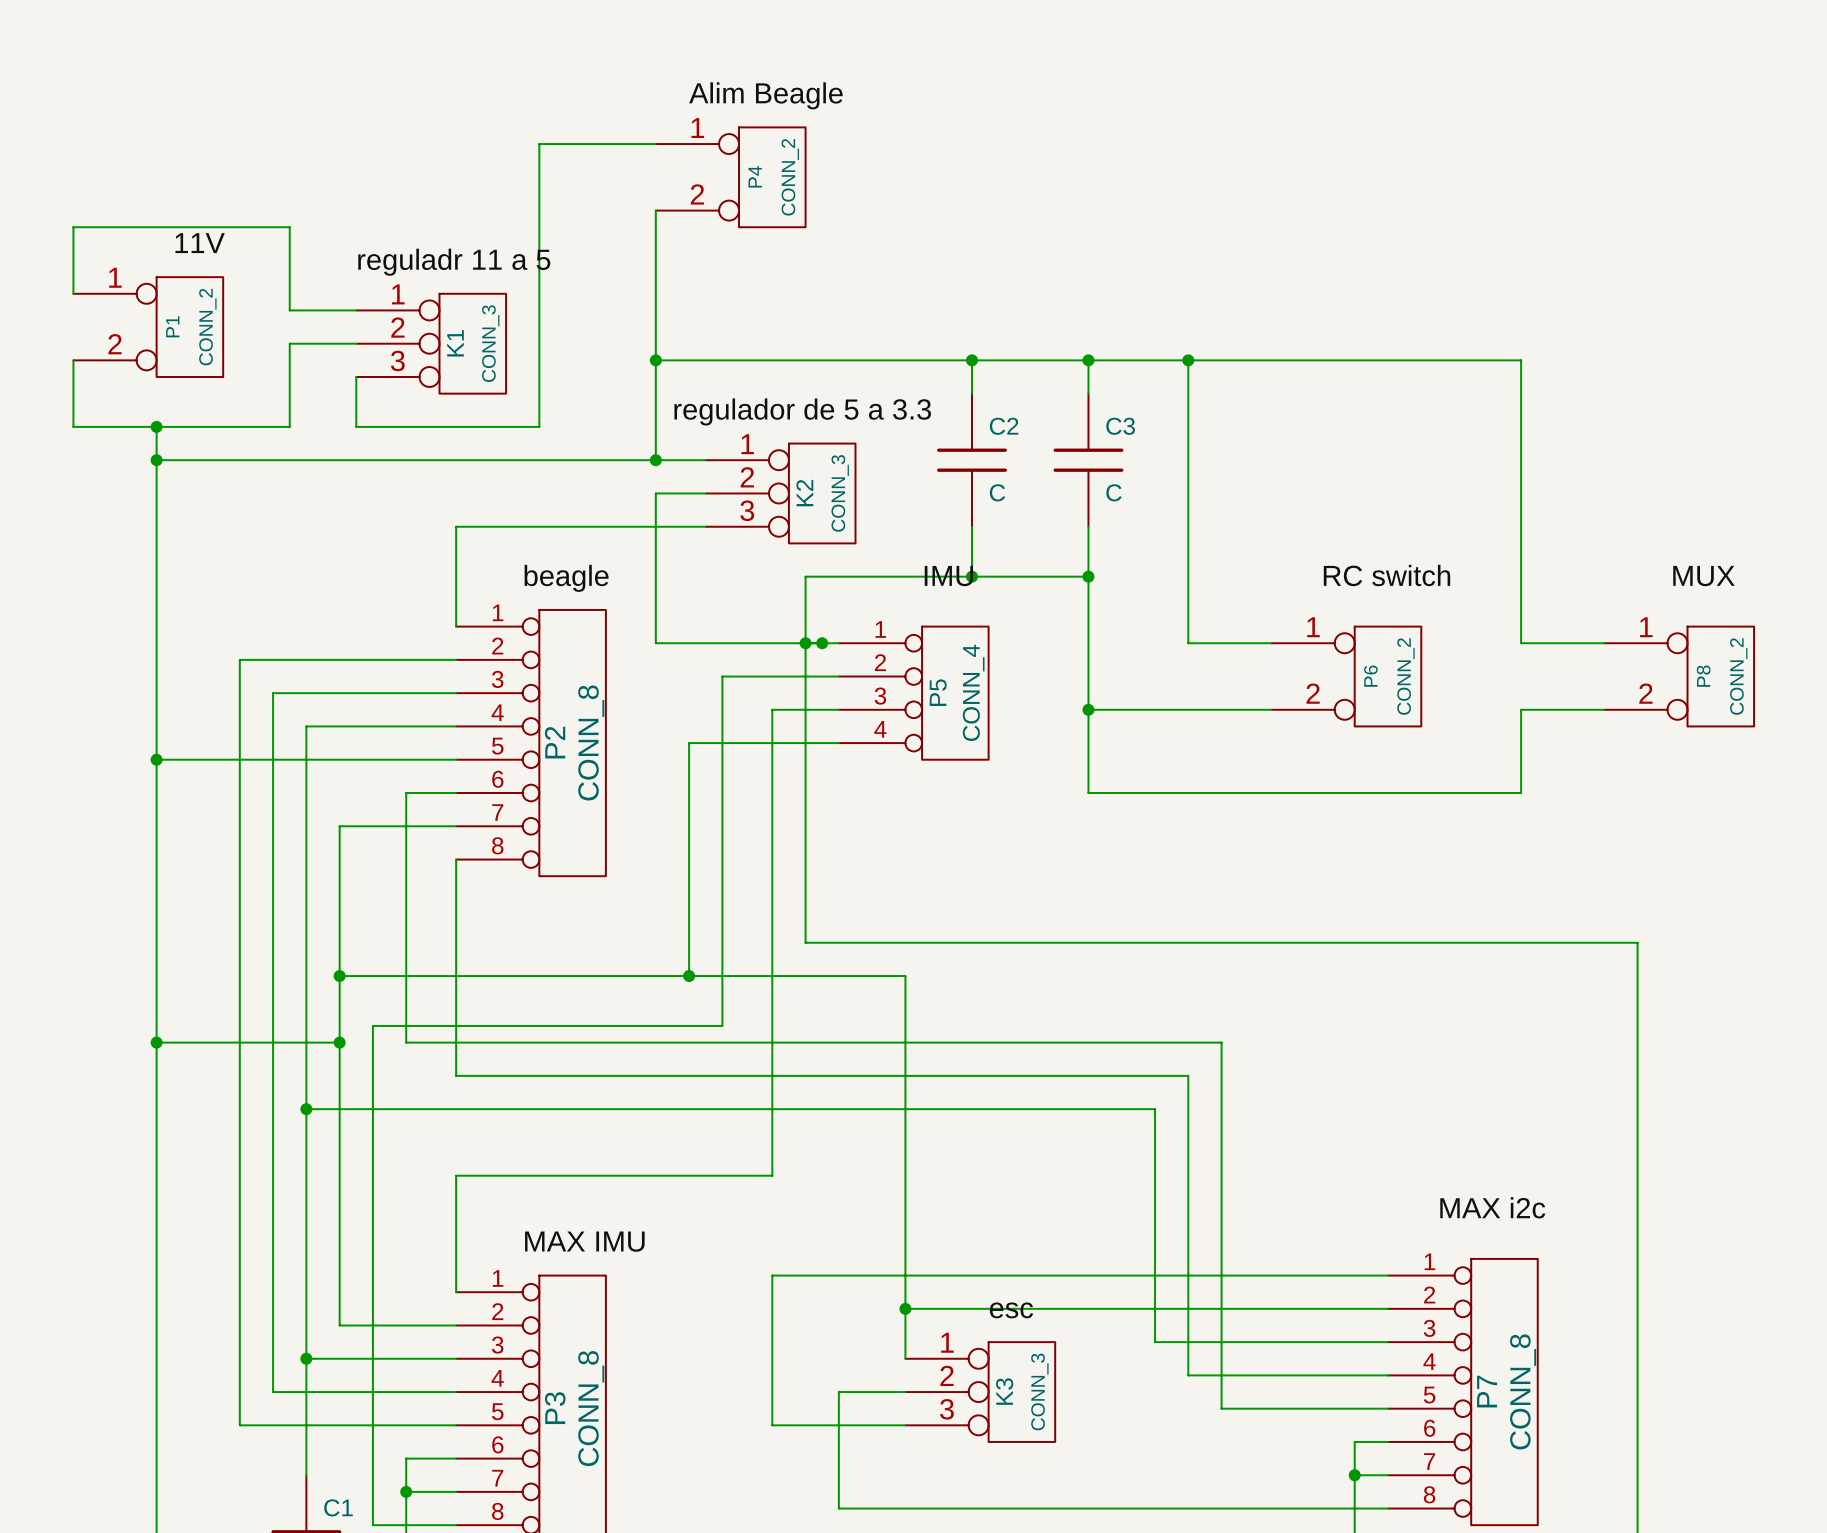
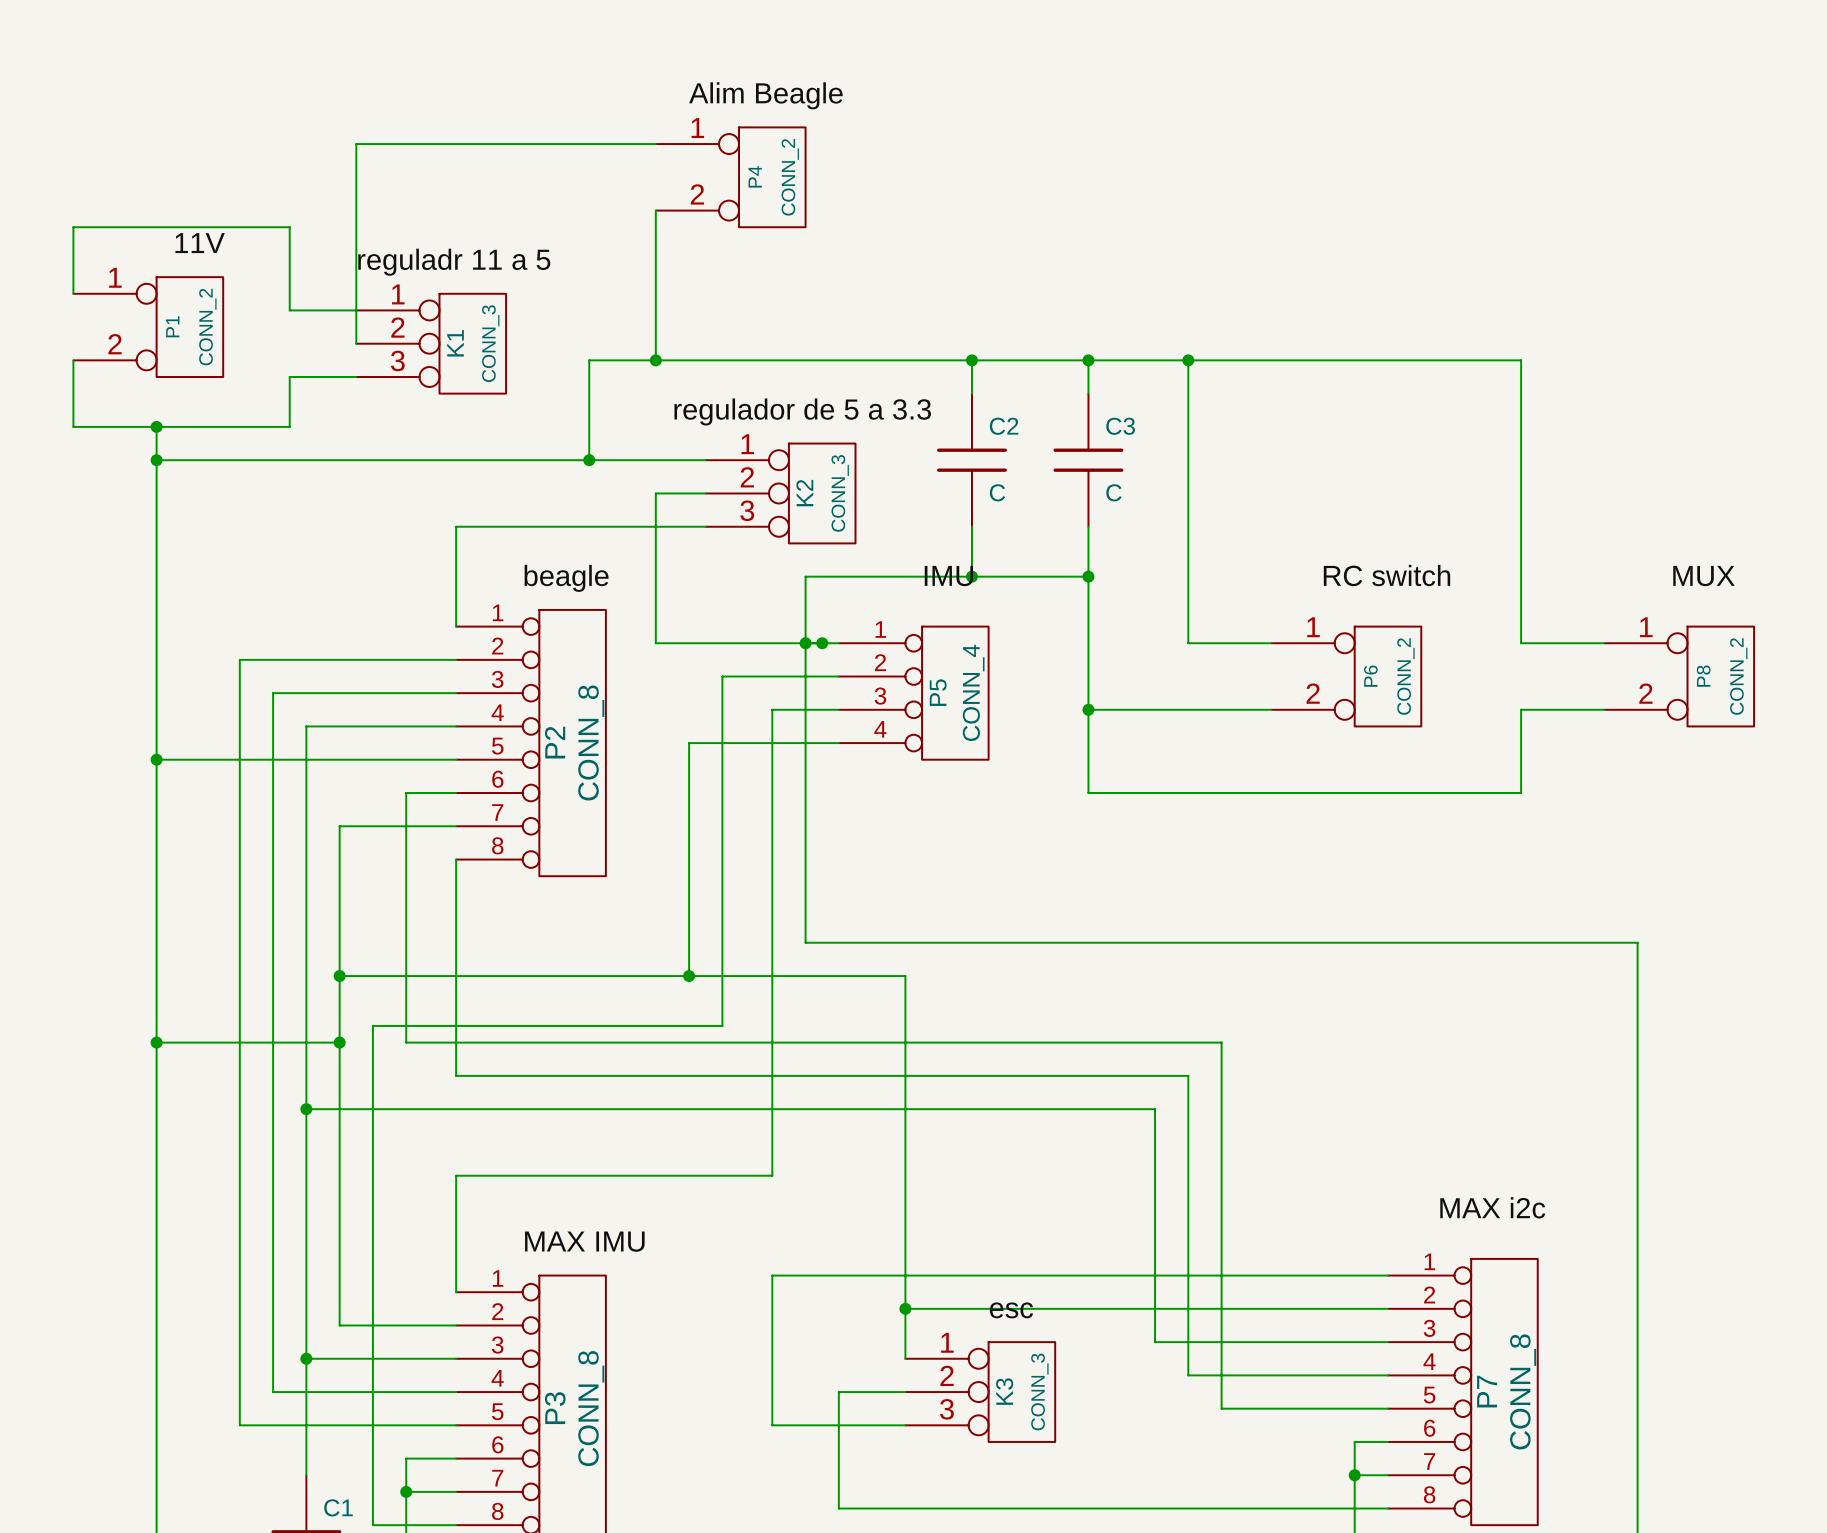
wire: (539, 144) (539, 426) (356, 426) (356, 376) -> (539, 144) (356, 144) (356, 343)
wire: (356, 343) (289, 343) (289, 376) -> (356, 376) (289, 376)
wire: (655, 360) (655, 460) -> (655, 360) (589, 360) (589, 460)
junction position: (655, 460) -> (589, 460)

